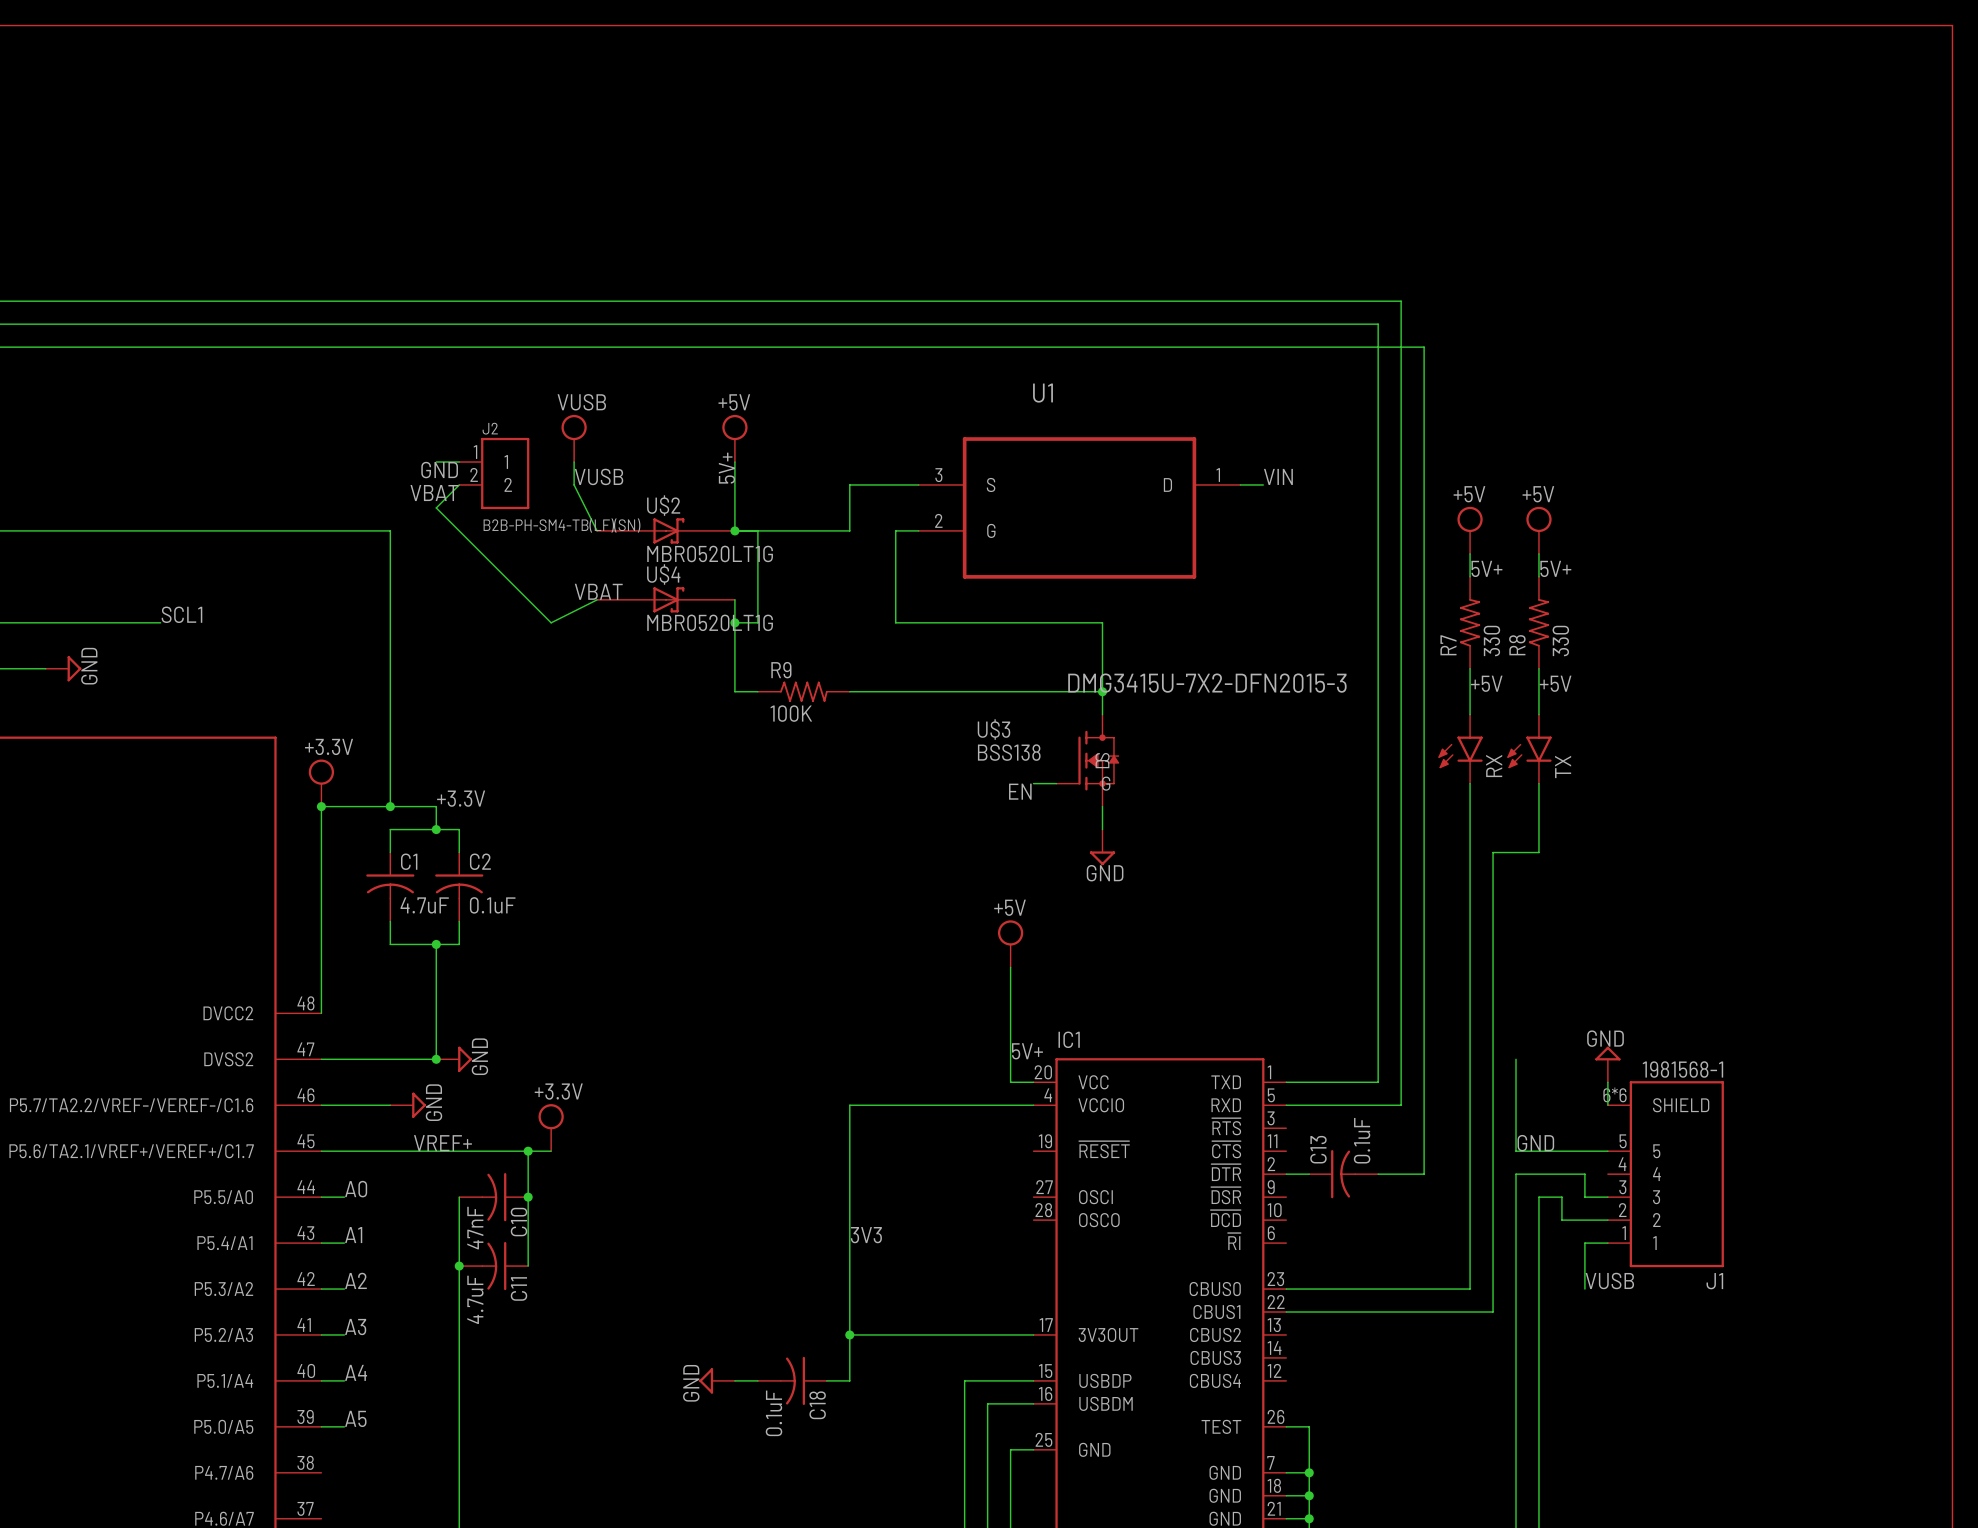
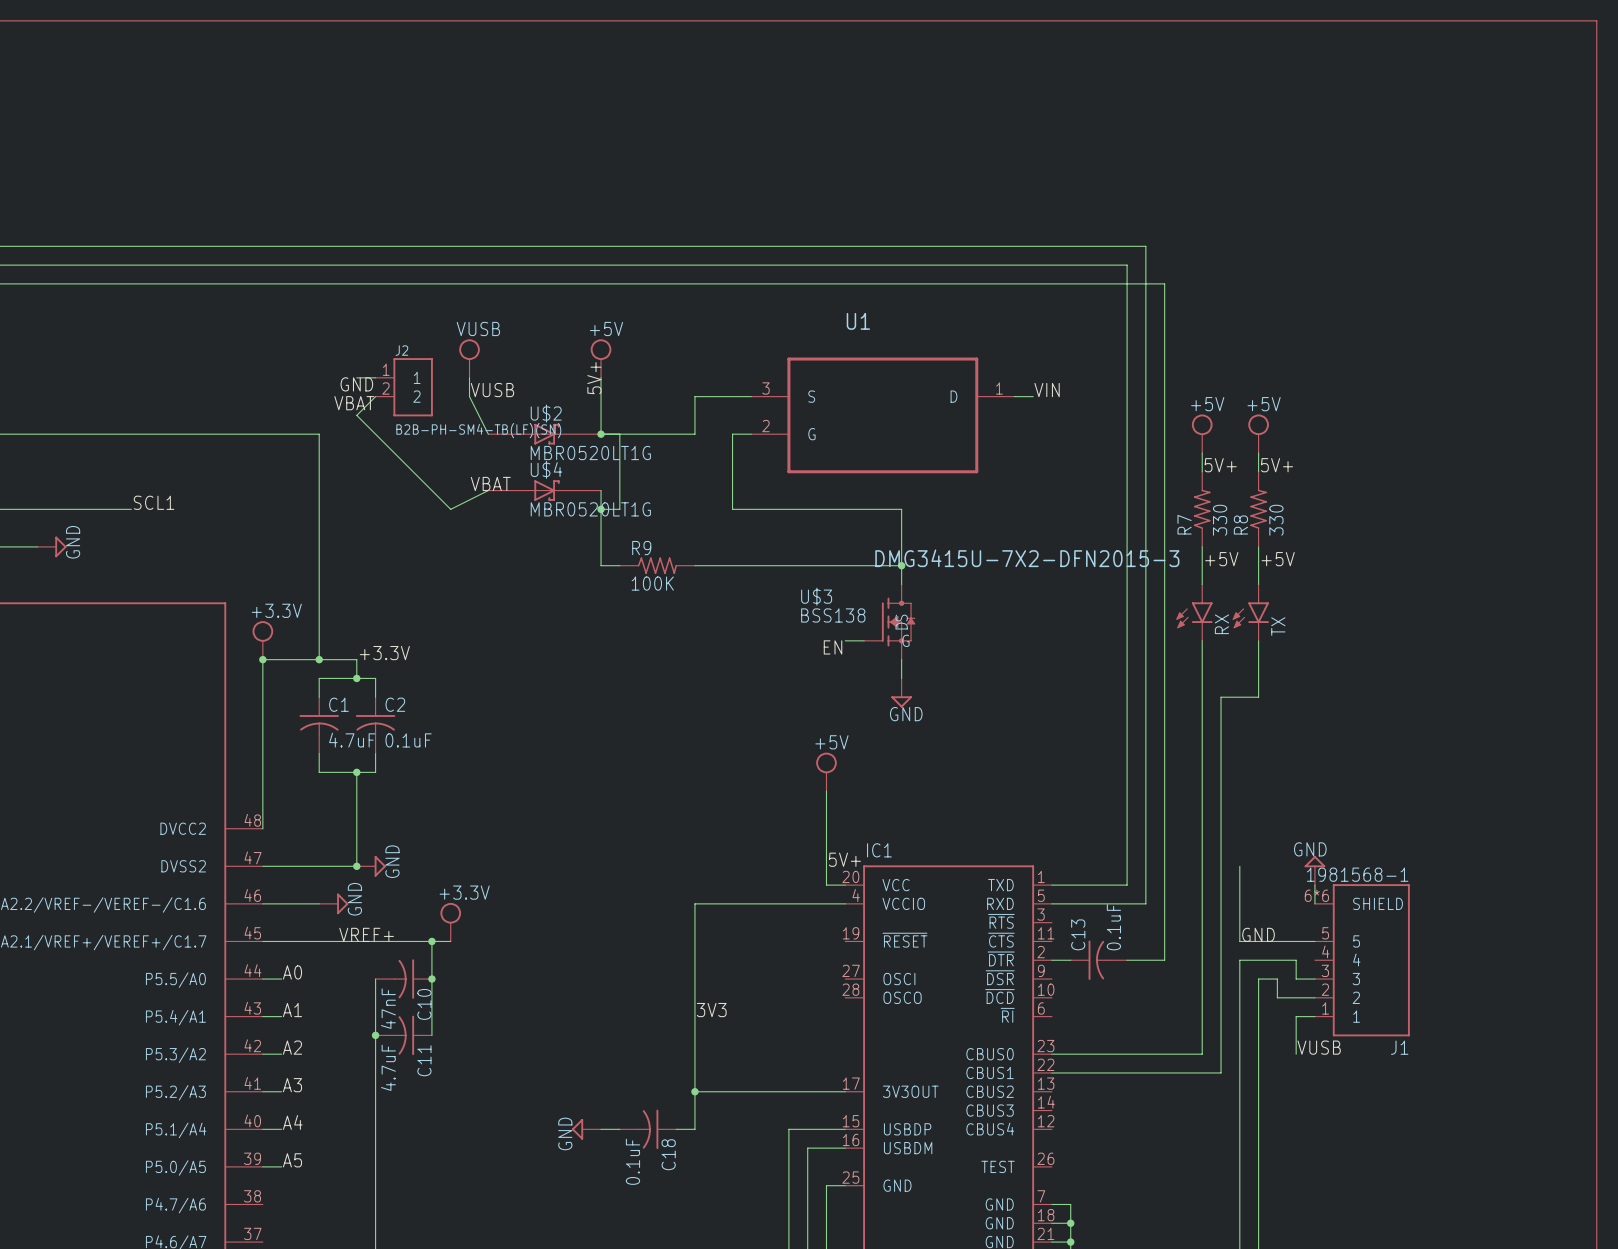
wire: (1286, 1426) (1309, 1426) (1309, 1472) -> none
junction: (1309, 1472) -> none

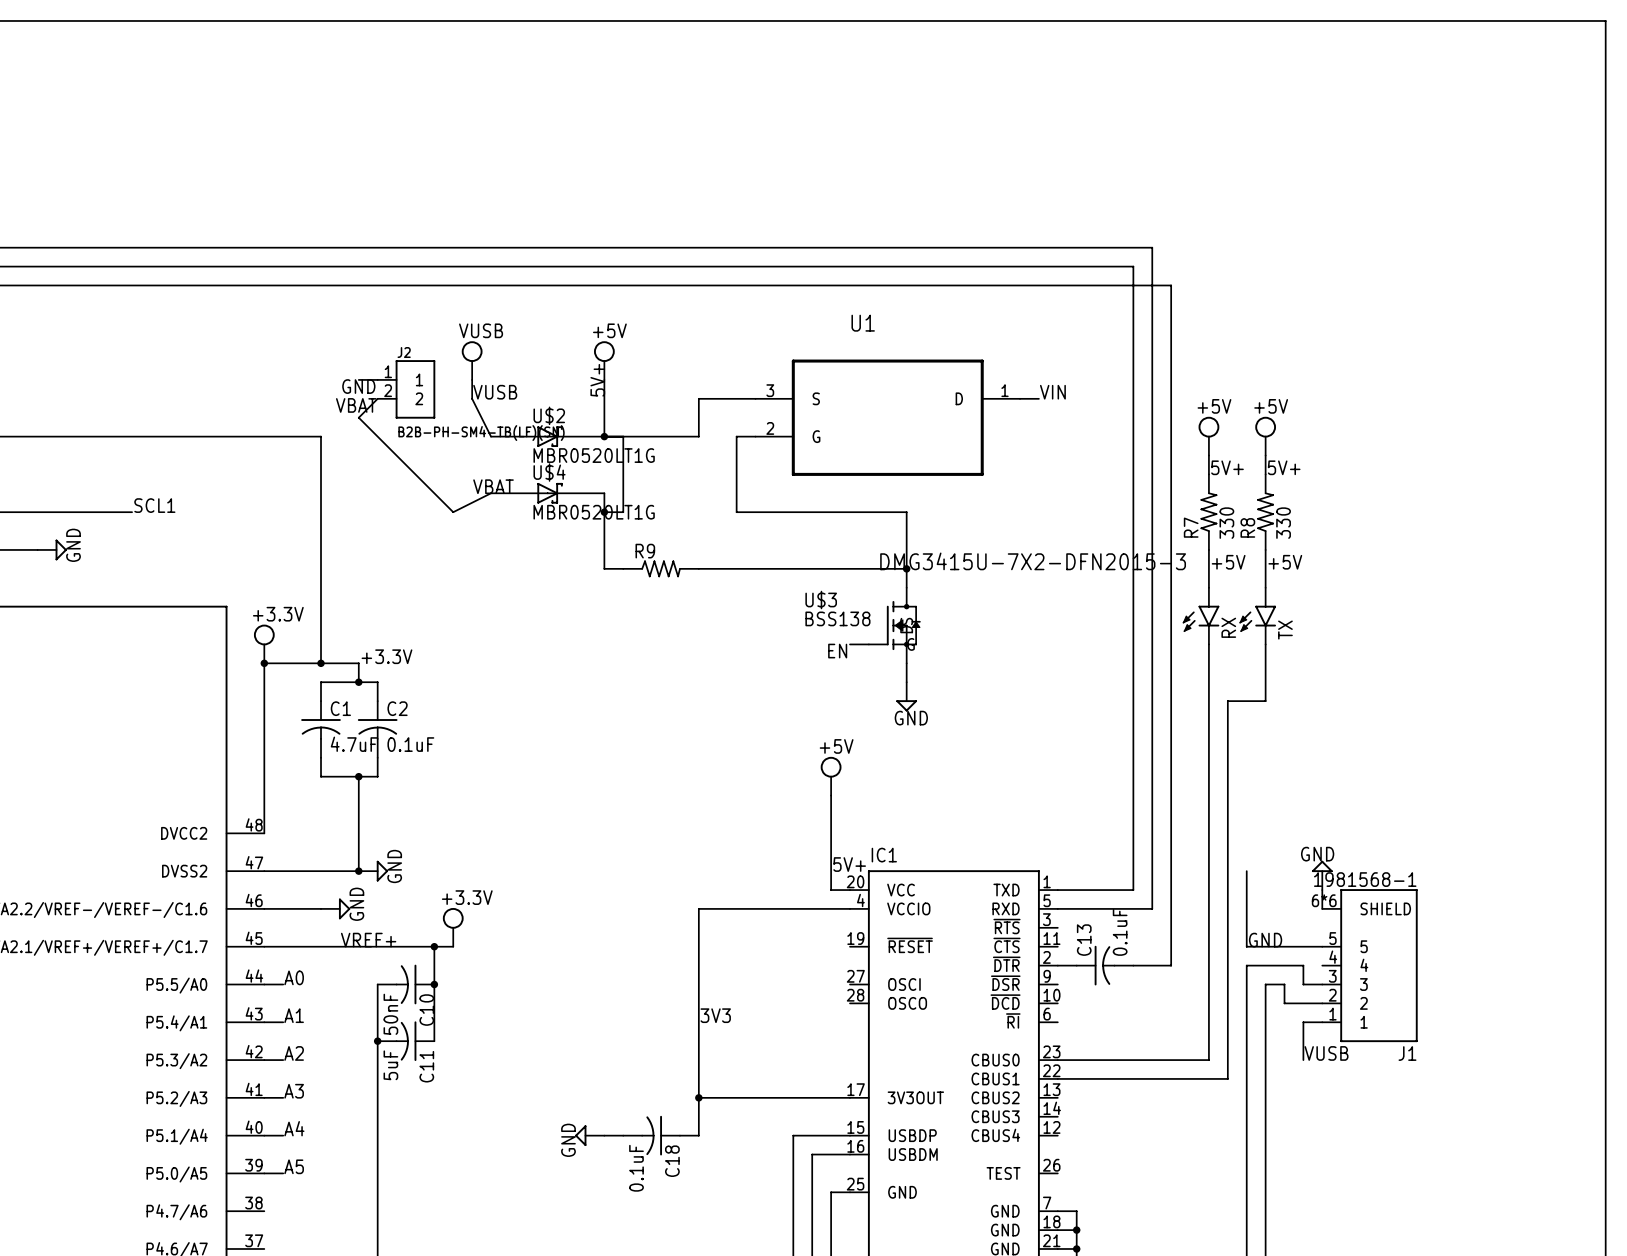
R9 value: 100K (652, 583) -> none
C10 value: 47nF (388, 1008) -> 50nF (390, 1014)
C11 value: 4.7uF (388, 1067) -> 5uF (390, 1065)

